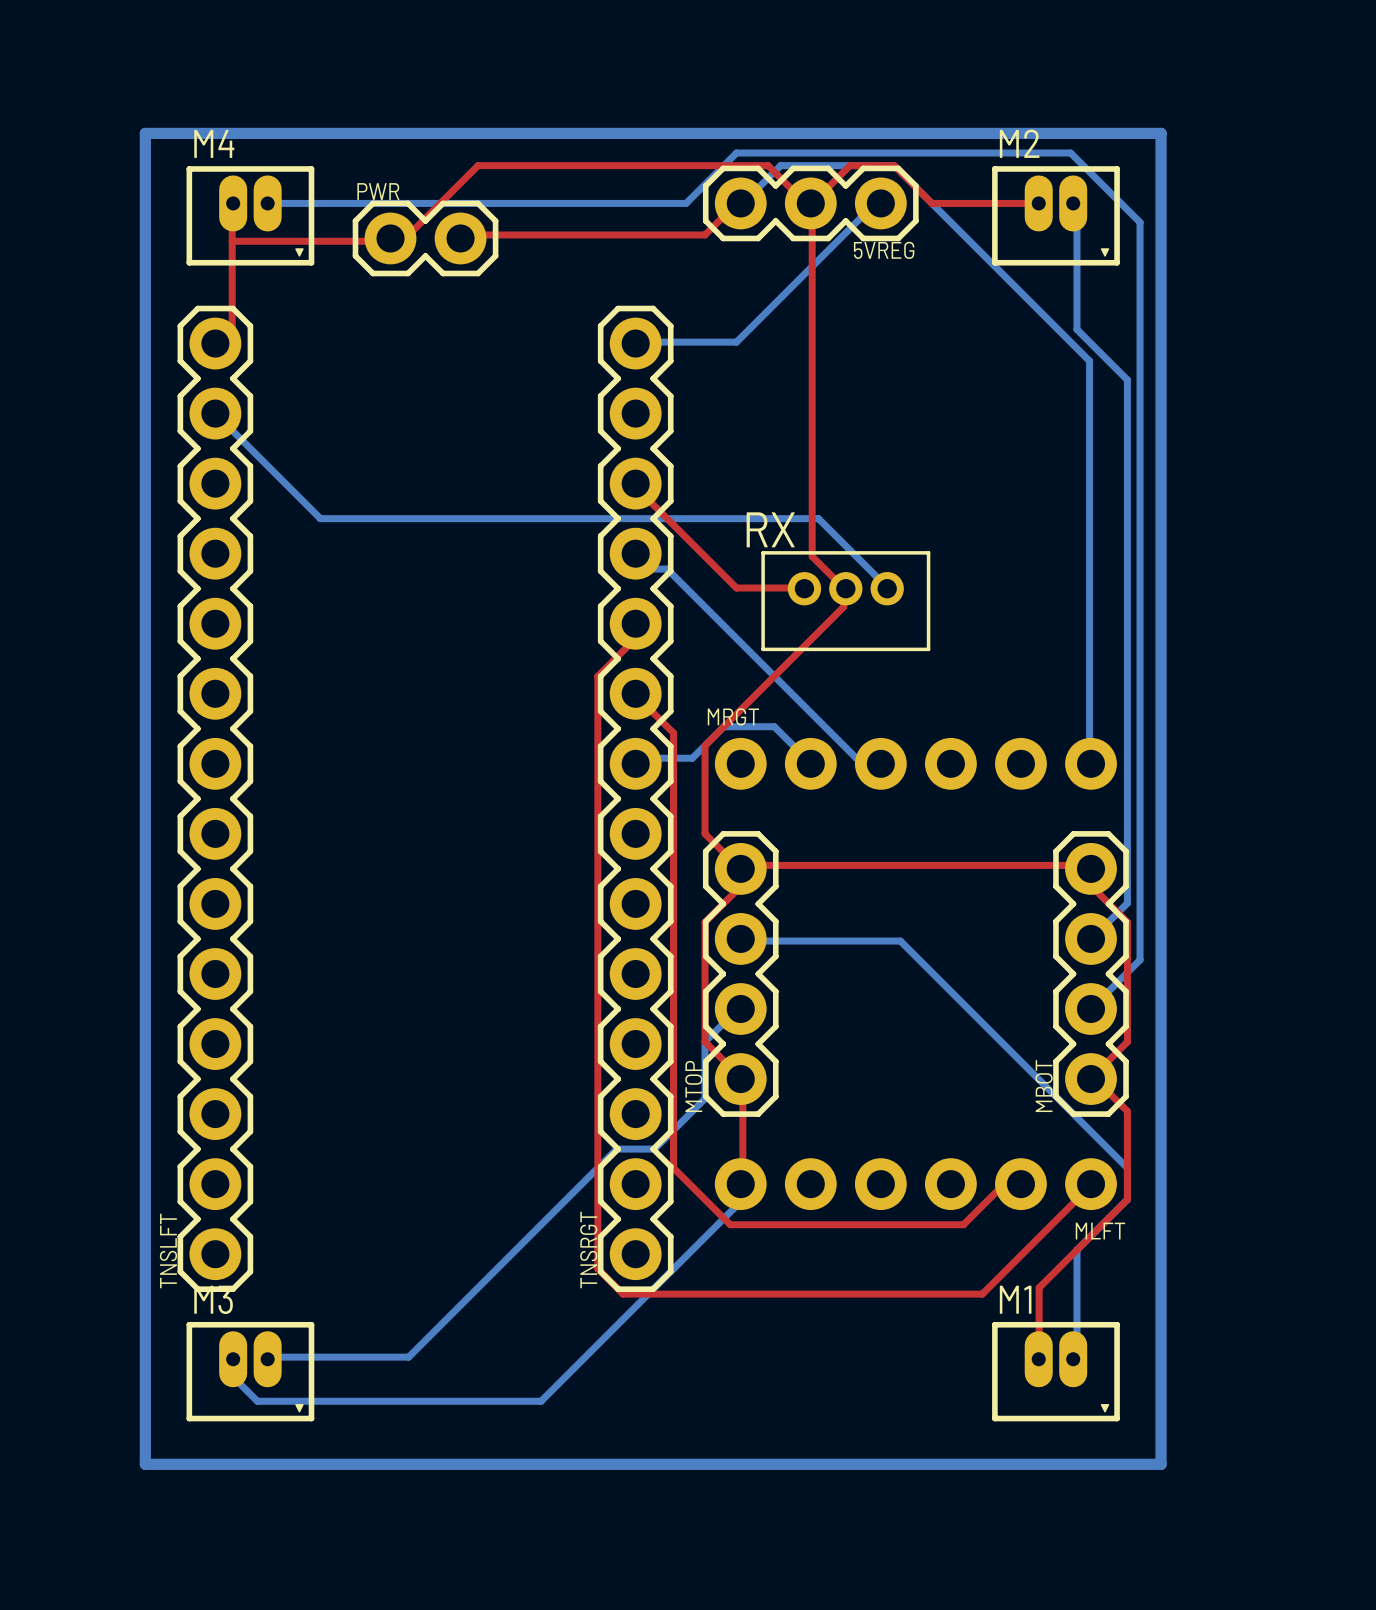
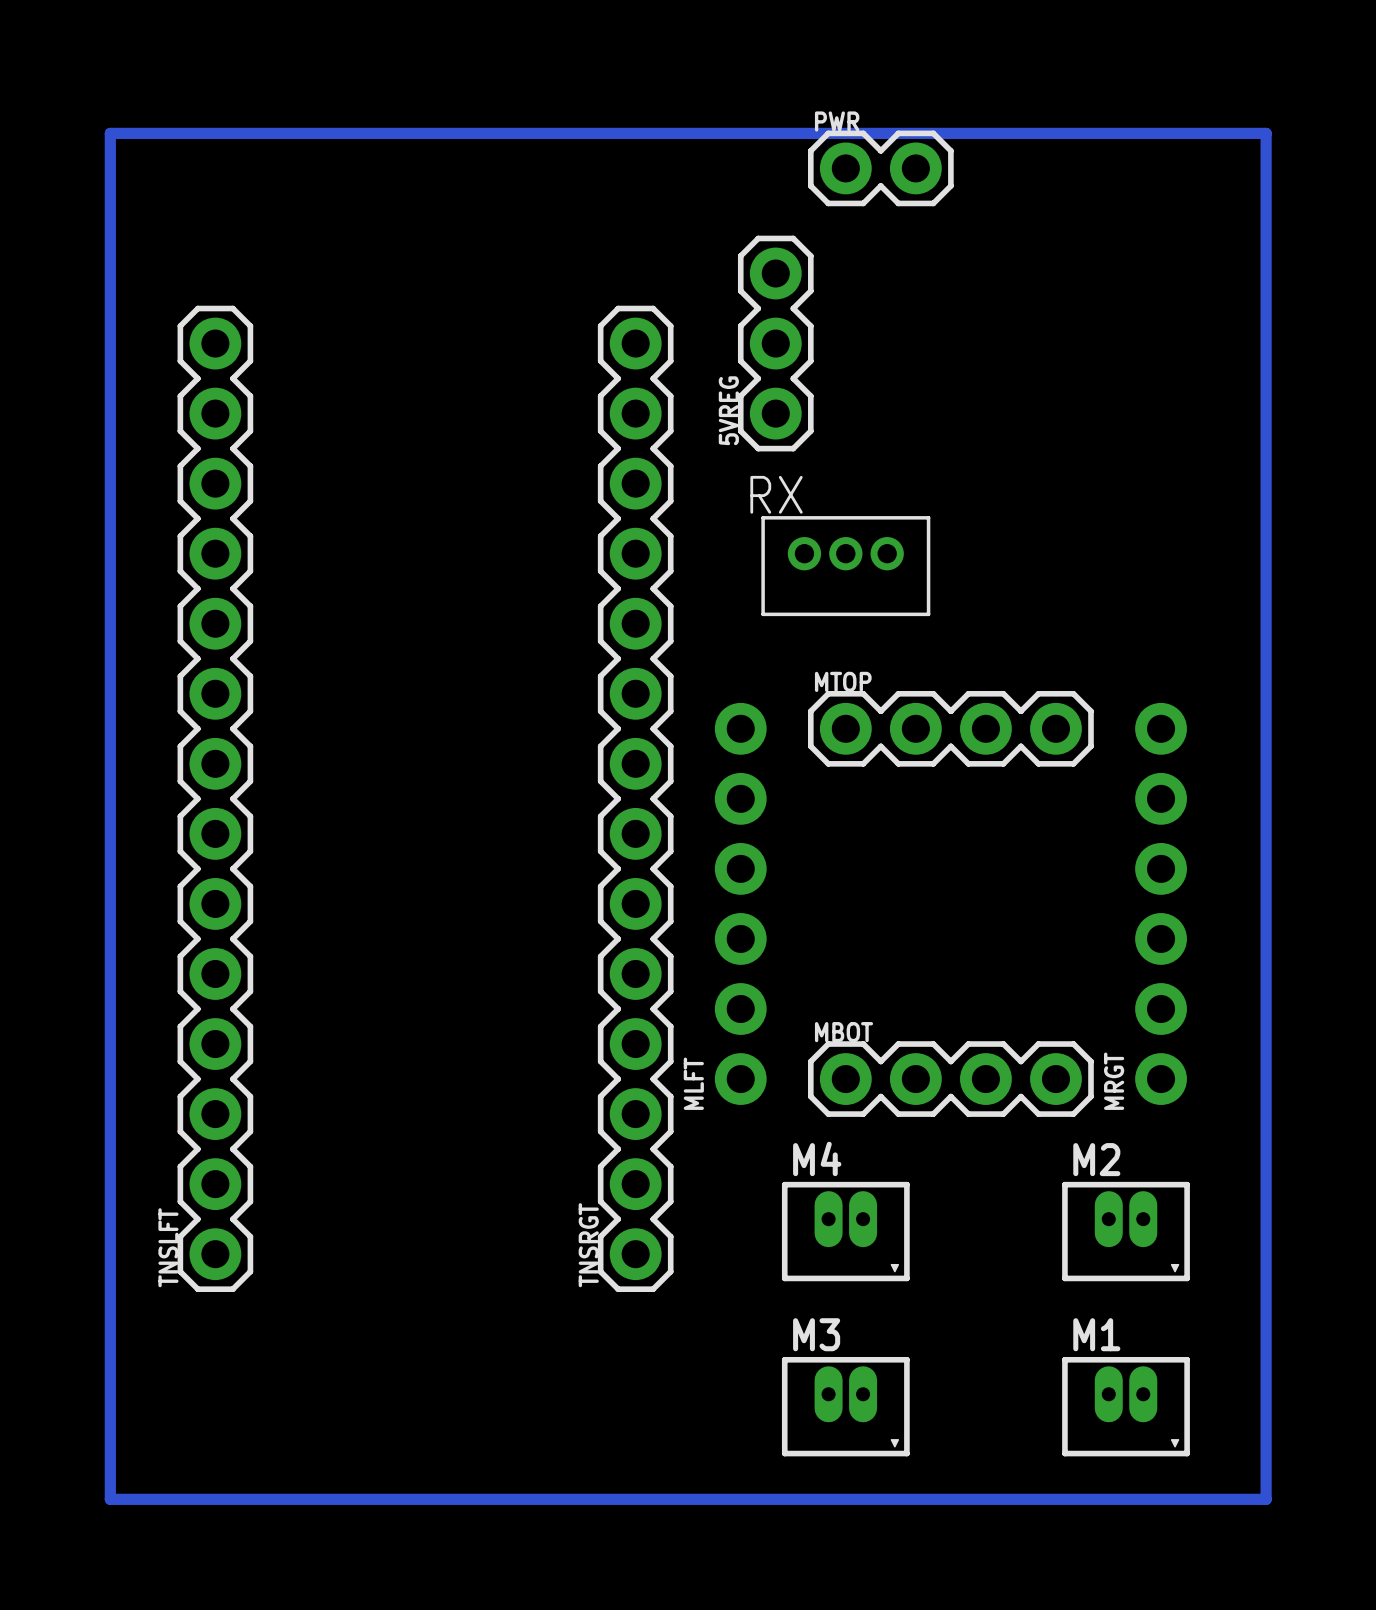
bottom track: (145, 133) (145, 1464) (1161, 1464) (1161, 133) -> (145, 133) (110, 133) (110, 1499) (1266, 1499) (1266, 133) (1161, 133)
top track: (233, 203) (232, 329) (219, 342) (215, 343) -> none
bottom track: (267, 203) (686, 203) (736, 153) (1070, 153) (1140, 222) (1140, 959) (1090, 1009) -> none
top track: (740, 203) (736, 203) (705, 234) (465, 234) (460, 238) -> none
bottom track: (740, 203) (780, 165) (894, 165) (1089, 361) (1090, 763) -> none
5VREG rotation: 0° (810, 203) -> 90° clockwise (775, 343)
5VREG position: (810, 203) -> (775, 343)
top track: (812, 203) (805, 203) (768, 165) (478, 165) (408, 234) (396, 234) (390, 238) -> none
top track: (812, 203) (850, 165) (894, 165) (931, 203) (1038, 203) -> none
top track: (812, 203) (812, 556) (845, 588) (843, 606) (705, 745) (705, 833) (740, 868) -> none
bottom track: (880, 203) (875, 203) (736, 342) (635, 343) -> none
bottom track: (1073, 203) (1076, 203) (1076, 329) (1127, 379) (1127, 903) (1090, 938) -> none
M4 position: (250, 215) -> (845, 1231)
M2 position: (1055, 215) -> (1126, 1231)
top track: (390, 238) (389, 241) (232, 241) -> none
PWR position: (425, 238) -> (880, 168)
bottom track: (215, 413) (320, 518) (818, 518) (881, 581) (881, 588) (887, 588) -> none
top track: (635, 483) (635, 487) (736, 588) (804, 588) -> none
bottom track: (635, 553) (635, 569) (667, 569) (856, 758) (875, 758) (880, 763) -> none
RX position: (845, 601) -> (845, 566)
top track: (635, 623) (635, 638) (597, 676) (597, 1268) (623, 1294) (982, 1294) (1090, 1184) -> none
top track: (635, 693) (673, 733) (673, 1168) (730, 1224) (963, 1224) (1001, 1186) (1020, 1186) (1020, 1184) -> none
MRGT name position: MRGT (733, 716) -> MRGT (1114, 1081)
bottom track: (635, 763) (635, 758) (692, 758) (723, 726) (774, 726) (810, 763) -> none
MRGT rotation: 0° (915, 763) -> 90° clockwise (1161, 903)
MRGT position: (915, 763) -> (1161, 903)
top track: (740, 868) (736, 871) (736, 890) (705, 922) (705, 1041) (742, 1079) (742, 1180) (740, 1184) -> none
top track: (740, 868) (742, 865) (1089, 865) (1095, 871) (1095, 890) (1127, 922) (1127, 1041) (1090, 1079) (1095, 1079) (1127, 1111) (1127, 1199) (1039, 1287) (1038, 1359) -> none
bottom track: (740, 938) (742, 941) (900, 941) (1127, 1168) (1127, 1199) (1076, 1249) (1076, 1357) (1073, 1359) -> none
MTOP rotation: 0° (740, 973) -> 90° clockwise (950, 728)
MTOP position: (740, 973) -> (950, 728)
MBOT rotation: 0° (1090, 973) -> 90° clockwise (950, 1079)
MBOT position: (1090, 973) -> (950, 1079)
bottom track: (740, 1009) (736, 1010) (705, 1041) (705, 1098) (654, 1149) (616, 1149) (408, 1357) (270, 1357) (267, 1359) -> none
bottom track: (740, 1184) (736, 1186) (736, 1205) (541, 1401) (257, 1401) (238, 1382) (238, 1363) (233, 1359) -> none
MLFT rotation: 0° (915, 1184) -> 90° clockwise (740, 903)
MLFT position: (915, 1184) -> (740, 903)
M3 position: (250, 1371) -> (845, 1406)
M1 position: (1055, 1371) -> (1126, 1406)

